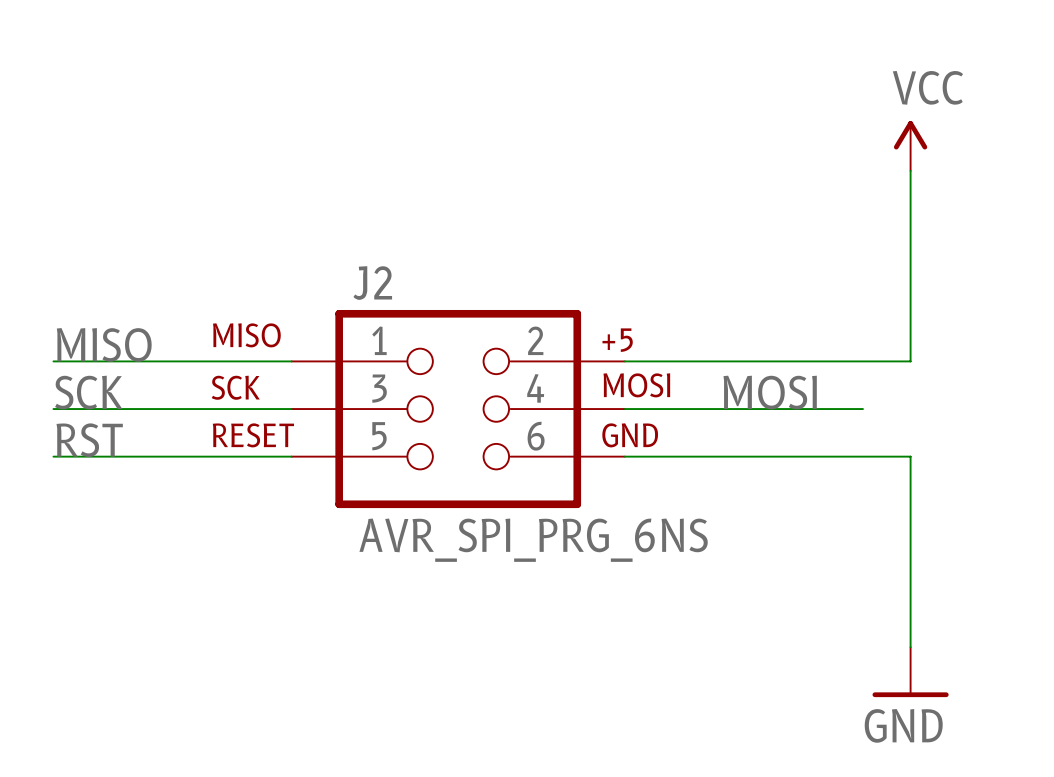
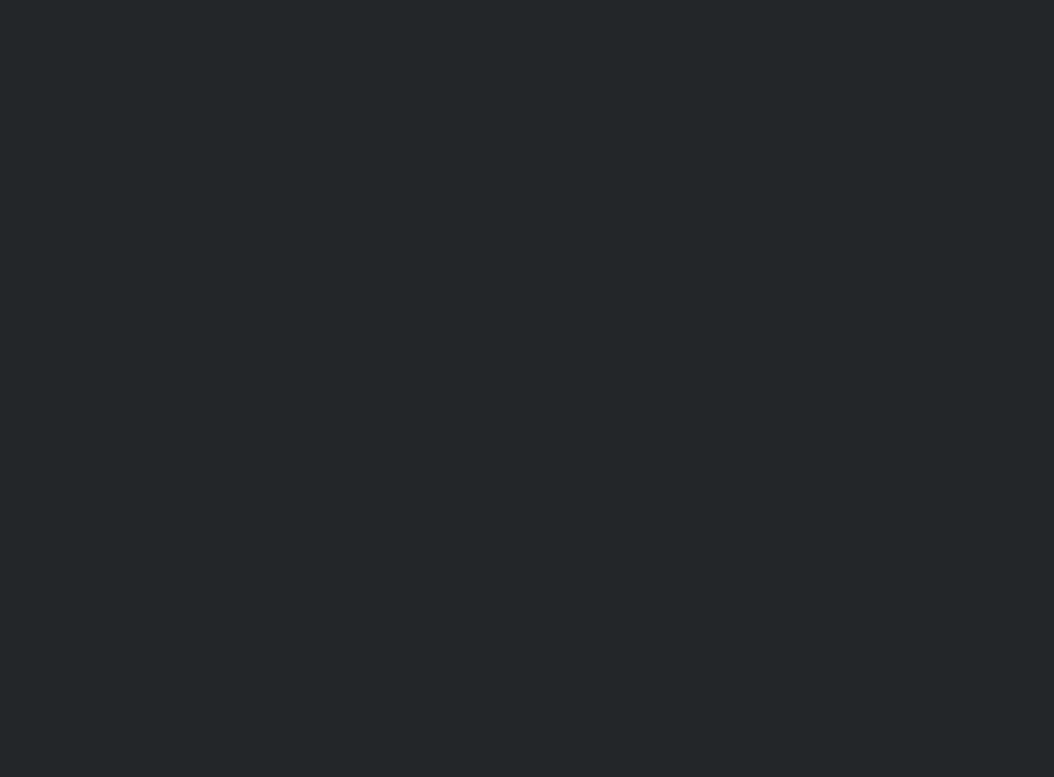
power symbol: VCC (910, 145) -> none
wire: (910, 170) (910, 361) (624, 361) -> none
label: MISO (104, 344) -> none
wire: (53, 361) (291, 361) -> none
label: SCK (88, 392) -> none
label: MOSI (770, 392) -> none
wire: (53, 409) (291, 409) -> none
J2: AVR_SPI_PRG_6NS (458, 409) -> none
wire: (624, 409) (862, 409) -> none
label: RST (89, 440) -> none
wire: (53, 456) (291, 456) -> none
wire: (624, 456) (910, 456) (910, 647) -> none
power symbol: GND (910, 672) -> none

